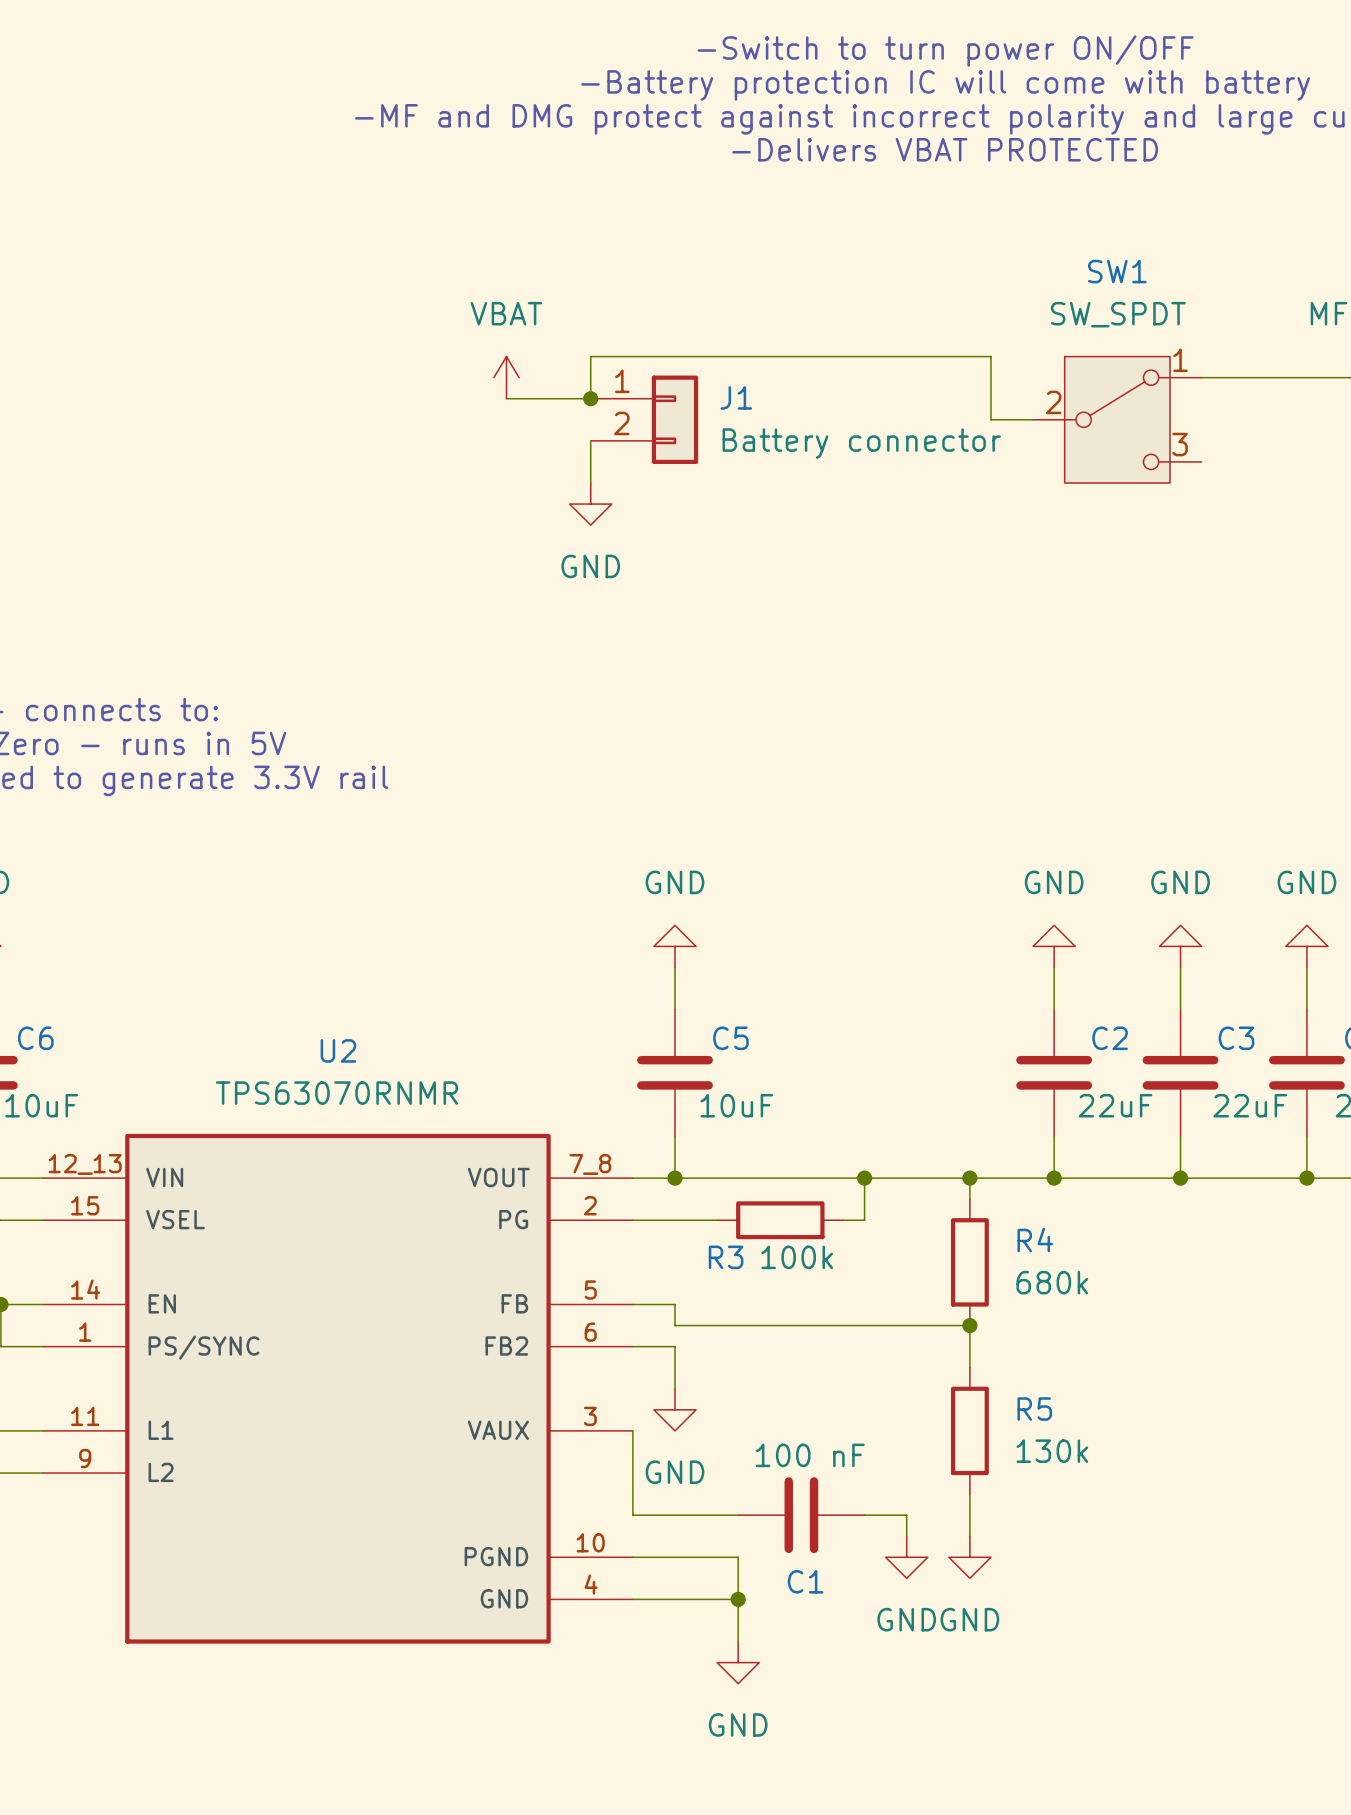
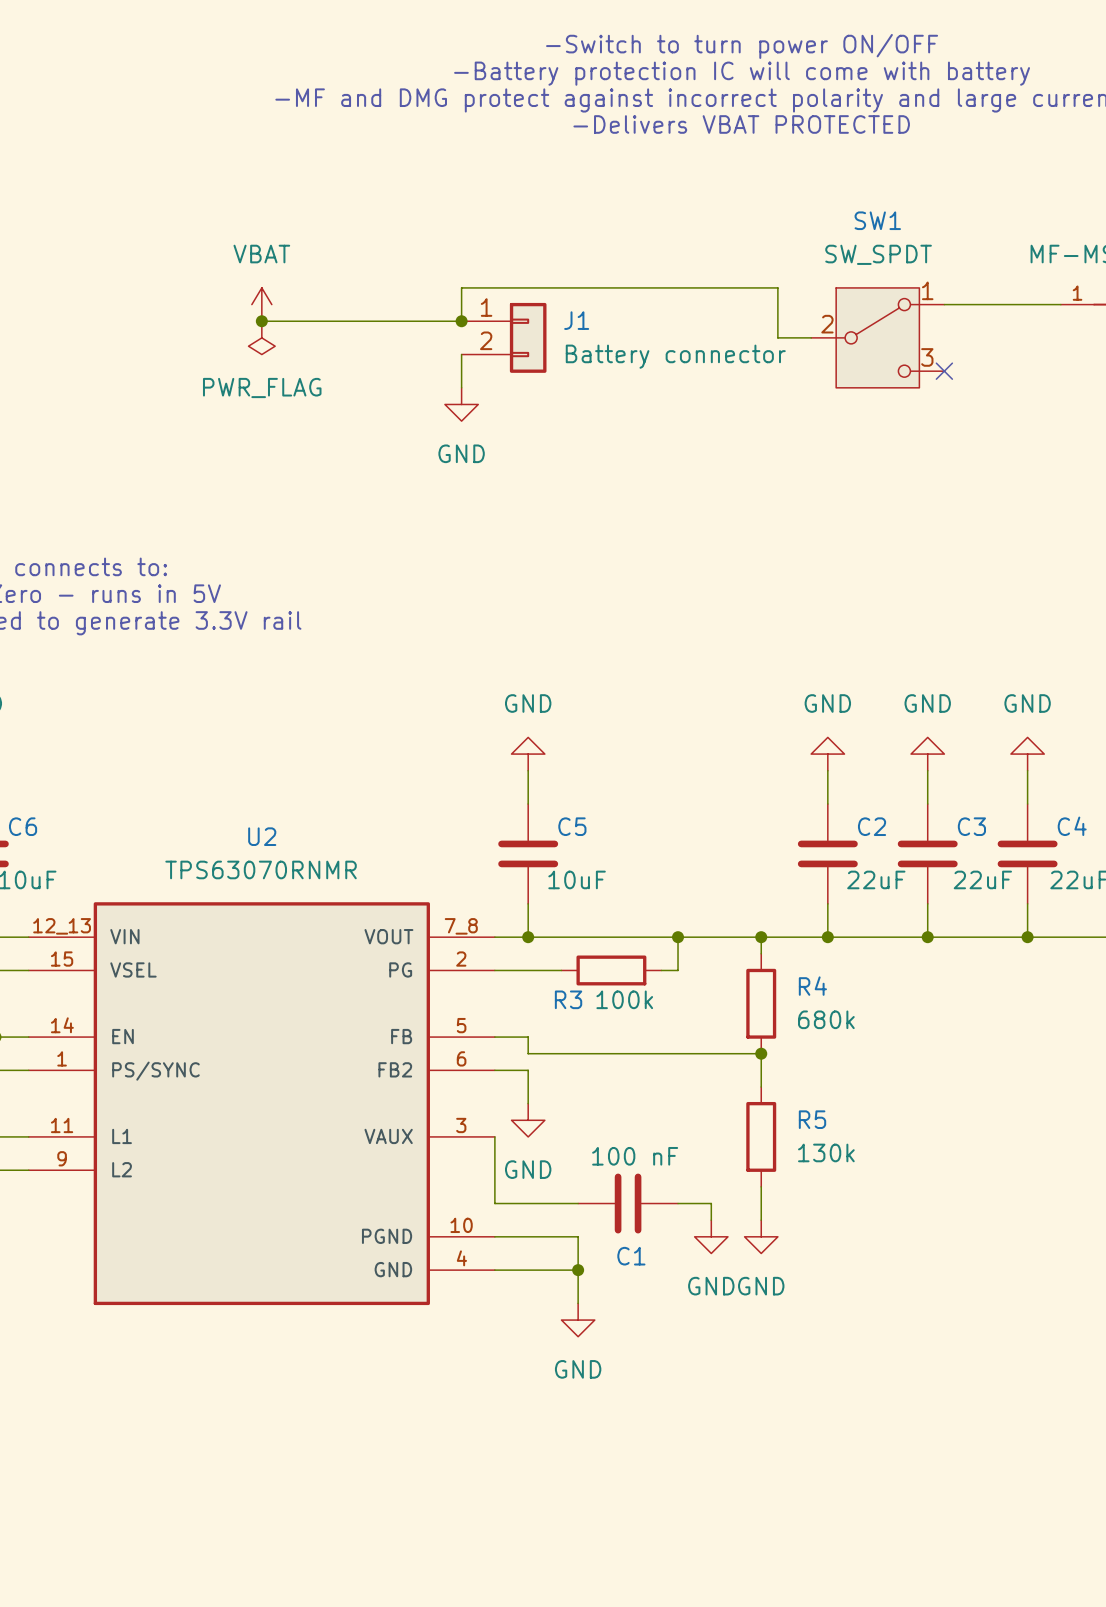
power symbol position: VBAT (506, 377) -> VBAT (261, 304)
wire: none -> (261, 321) (395, 321)
junction: none -> (261, 321)
power symbol: none -> PWR_FLAG (261, 337)
no-connect mark: none -> (944, 371)

